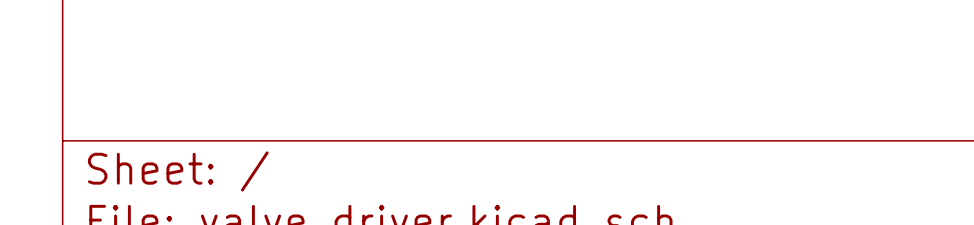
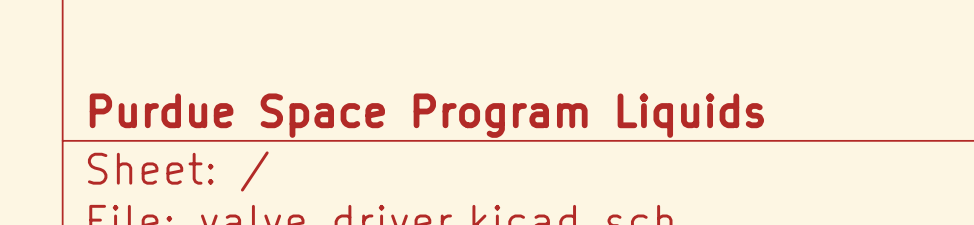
title block: none -> Purdue Space Program Liquids (426, 115)

